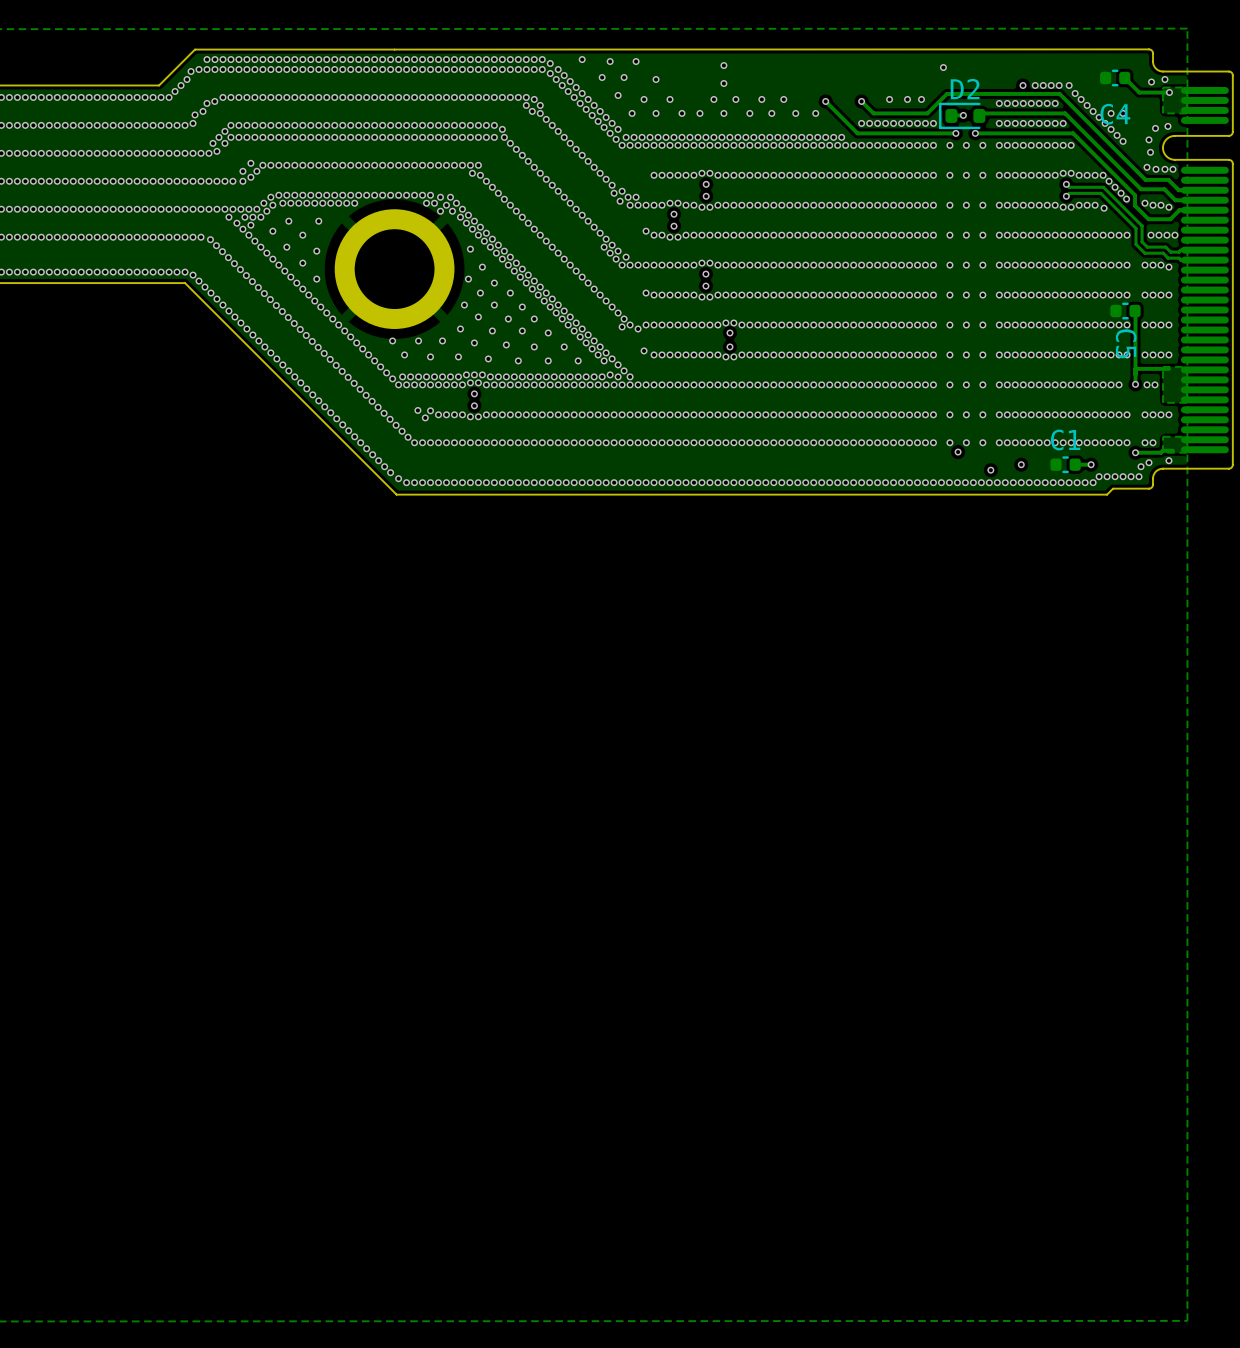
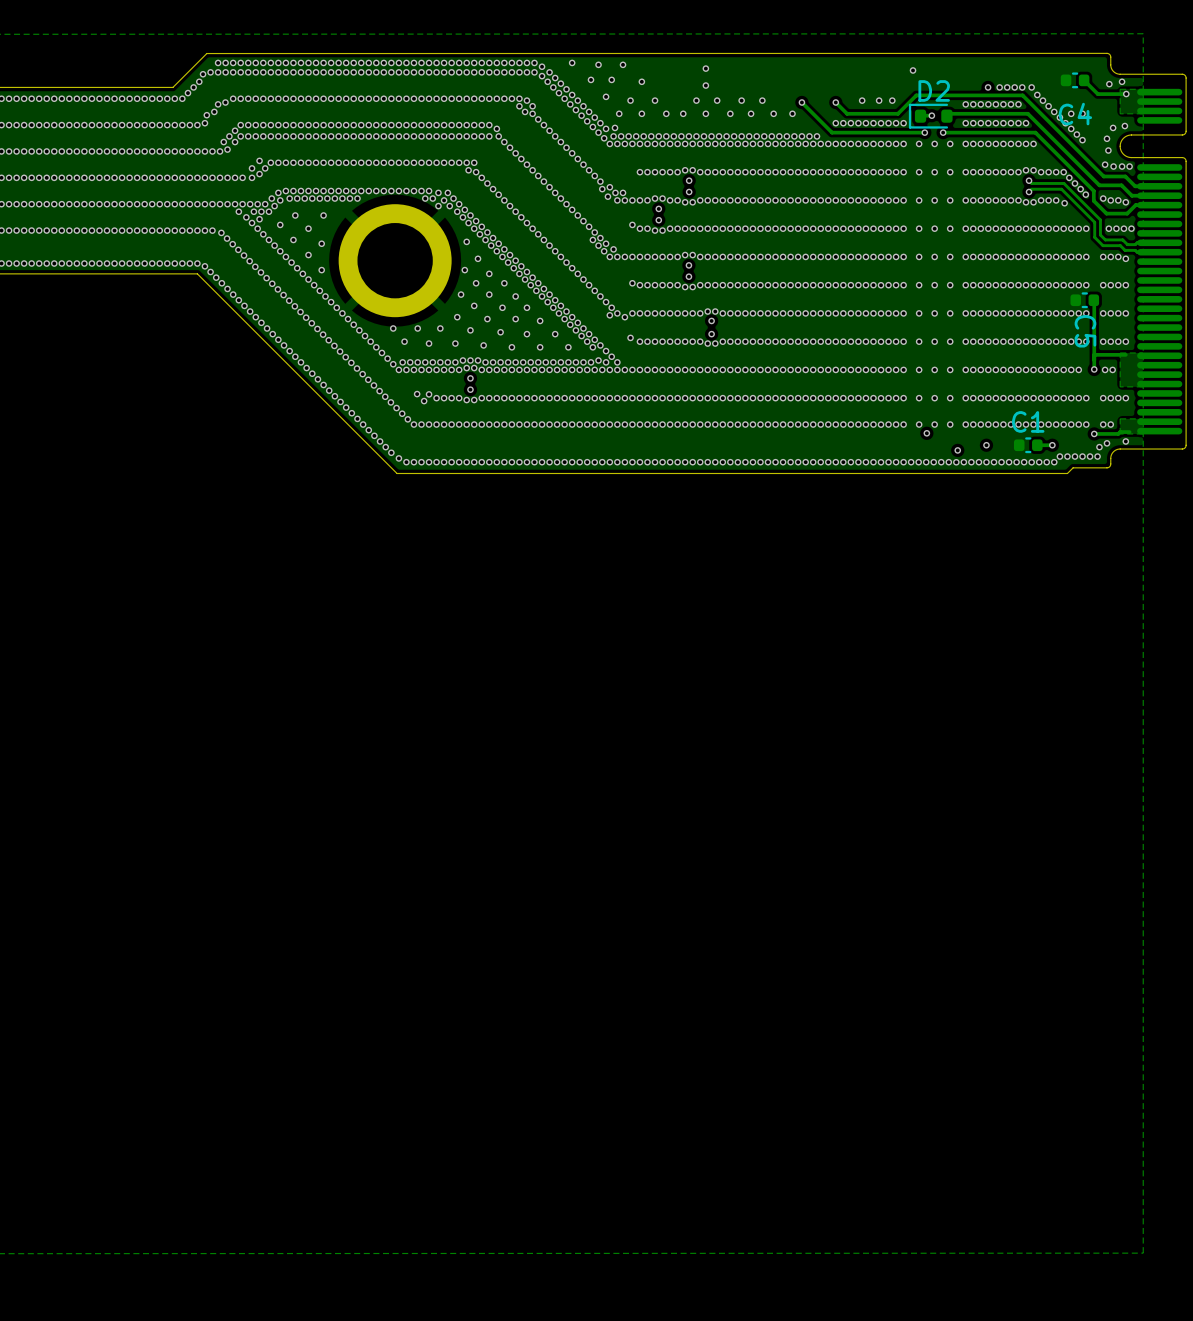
via: none -> (615, 127)

